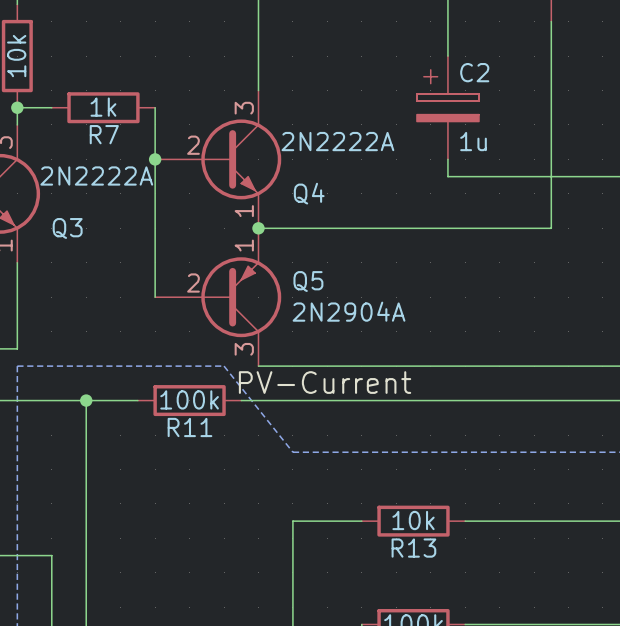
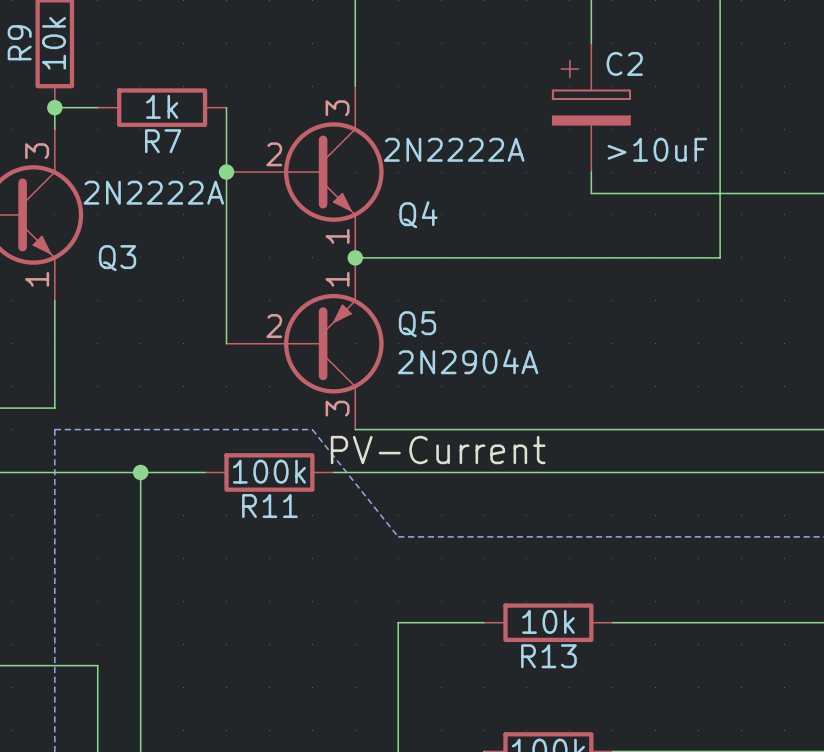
C2 value: 1u (473, 141) -> >10uF (657, 149)

